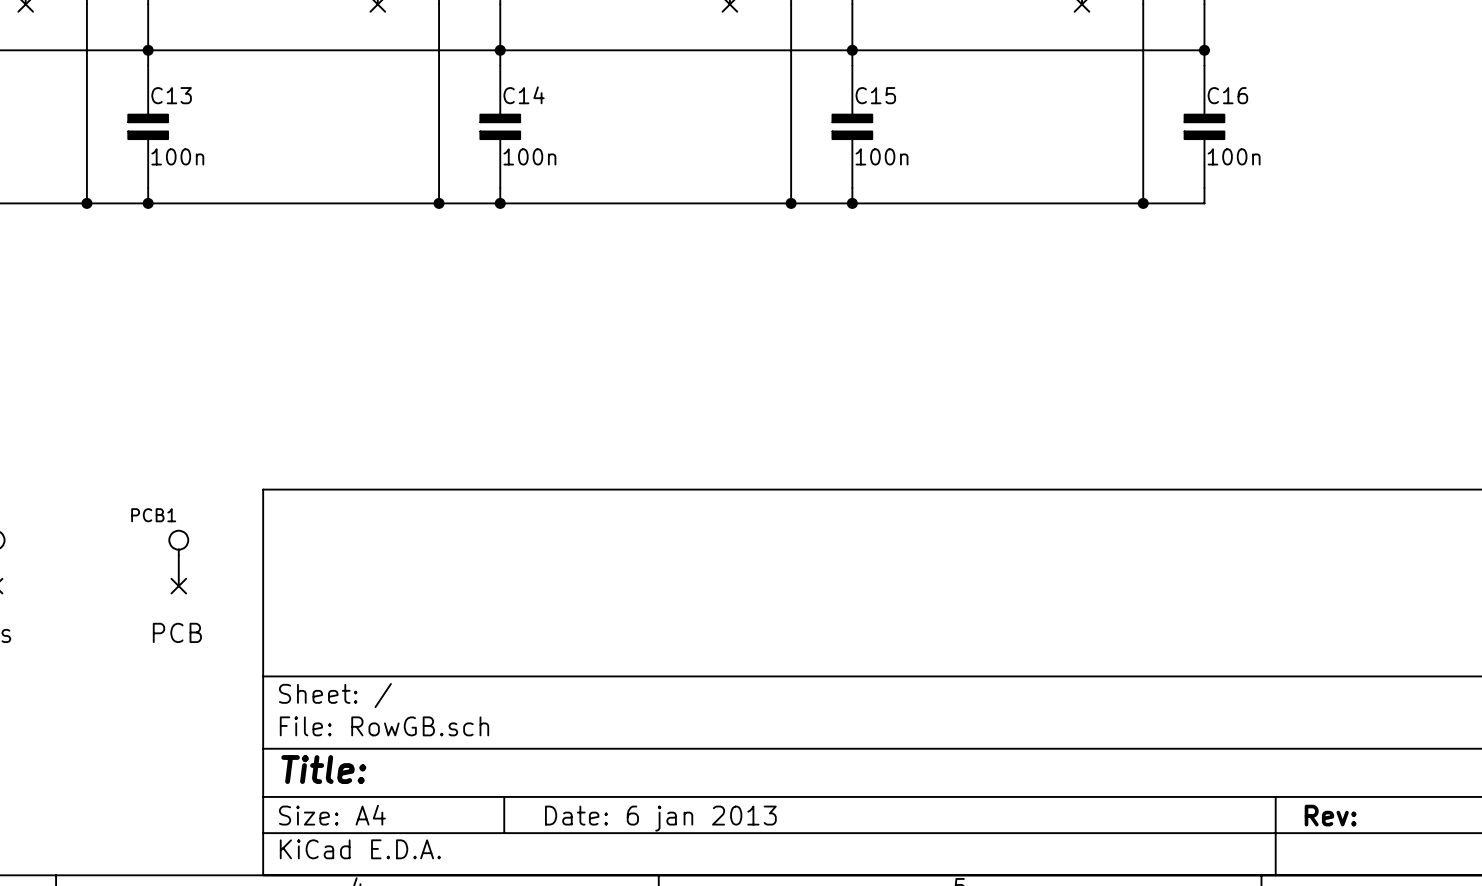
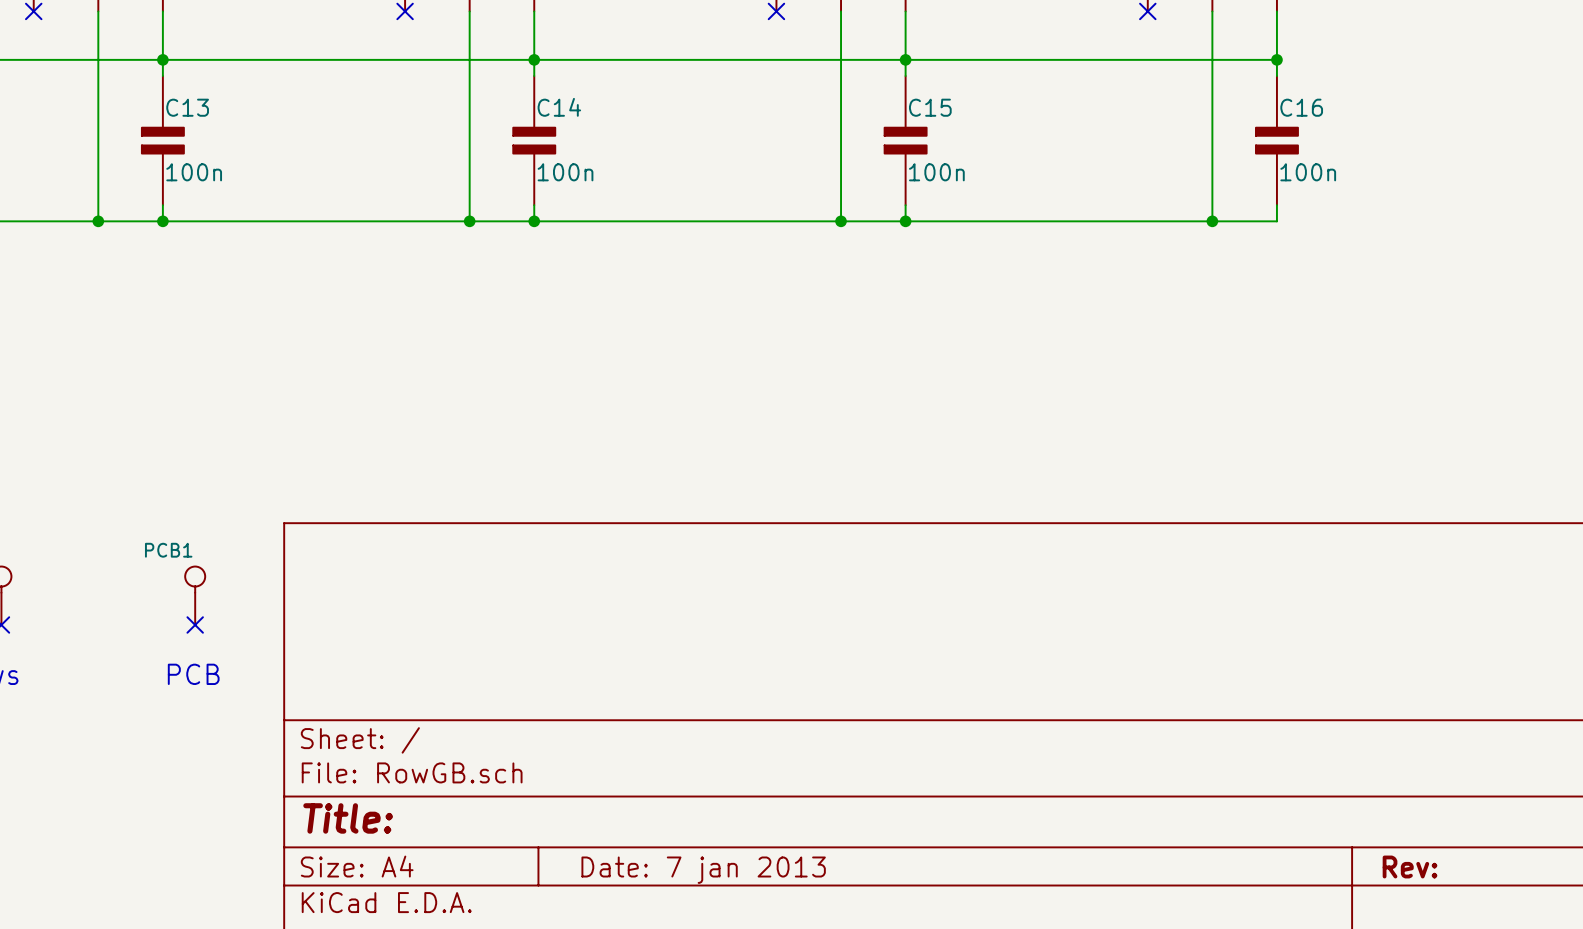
title block: Date: 6 jan 2013 (660, 818) -> Date: 7 jan 2013 (703, 870)

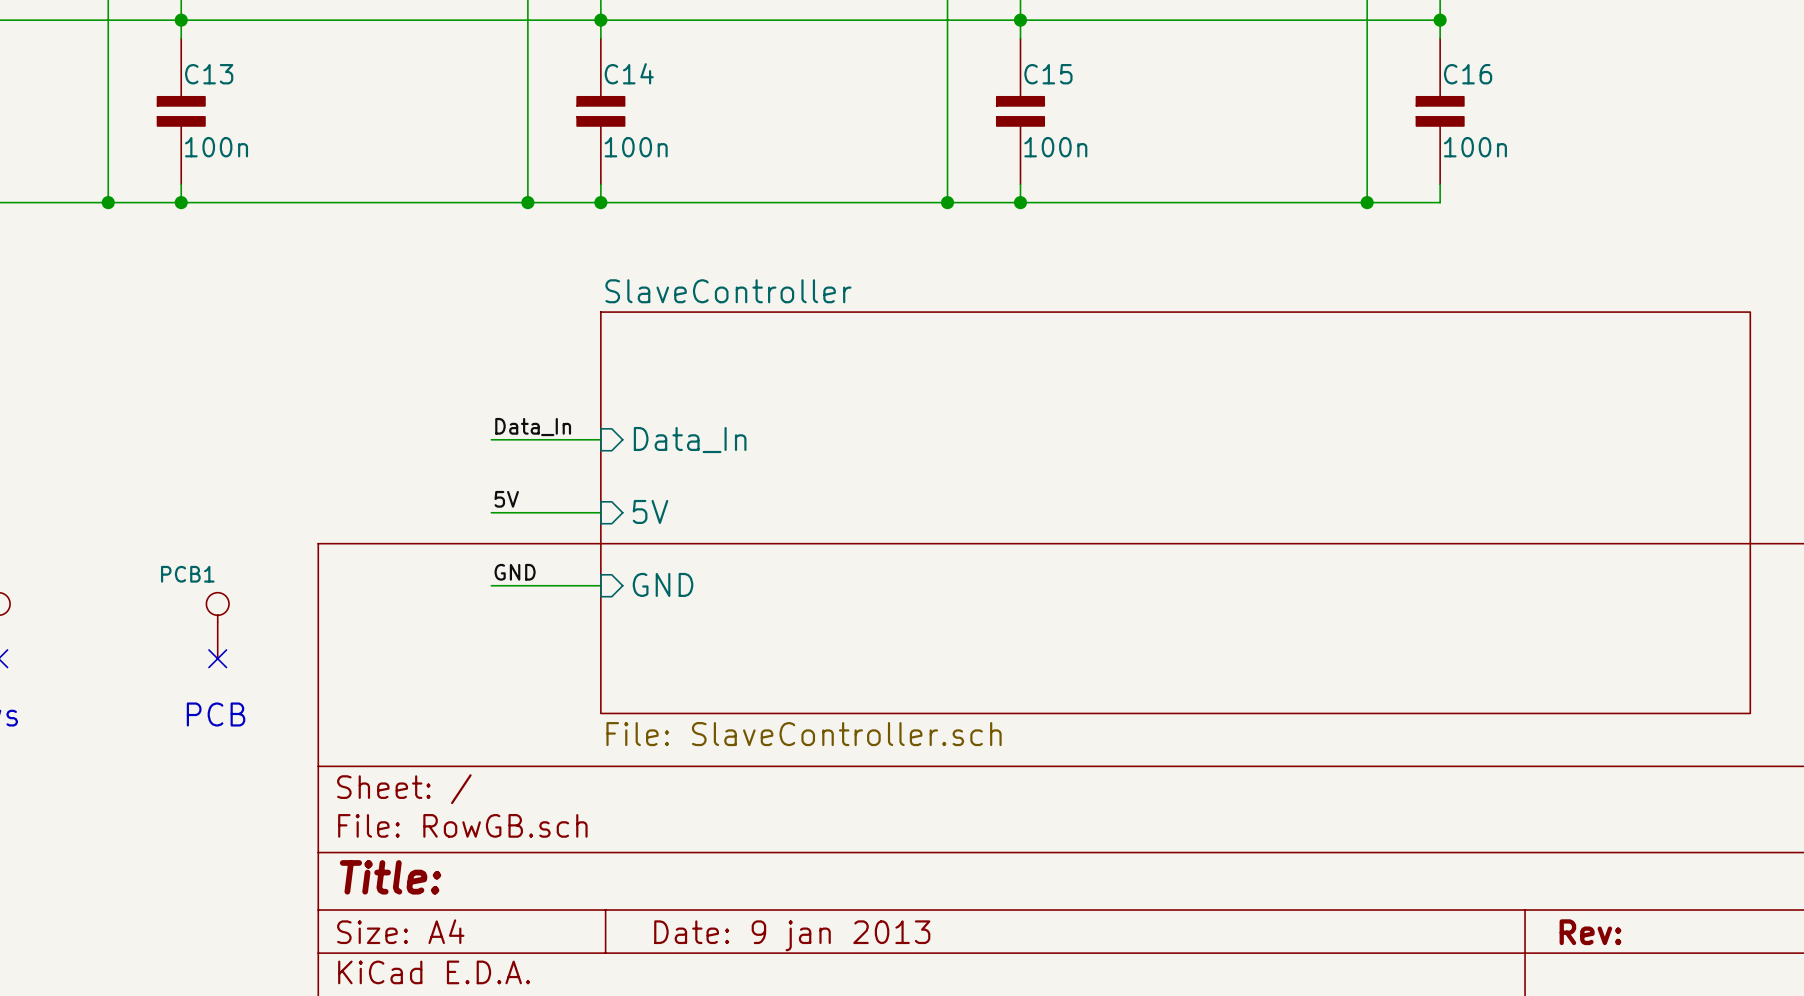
label: none -> Data_In (533, 427)
wire: none -> (491, 439) (600, 439)
sheet pin: none -> Data_In (690, 440)
label: none -> 5V (506, 499)
wire: none -> (491, 512) (600, 512)
sheet pin: none -> 5V (650, 511)
sheet SlaveController: none -> File: SlaveController.sch (1175, 512)
label: none -> GND (515, 572)
sheet pin: none -> GND (663, 584)
wire: none -> (491, 585) (600, 585)
title block: Date: 7 jan 2013 (703, 870) -> Date: 9 jan 2013 (792, 935)

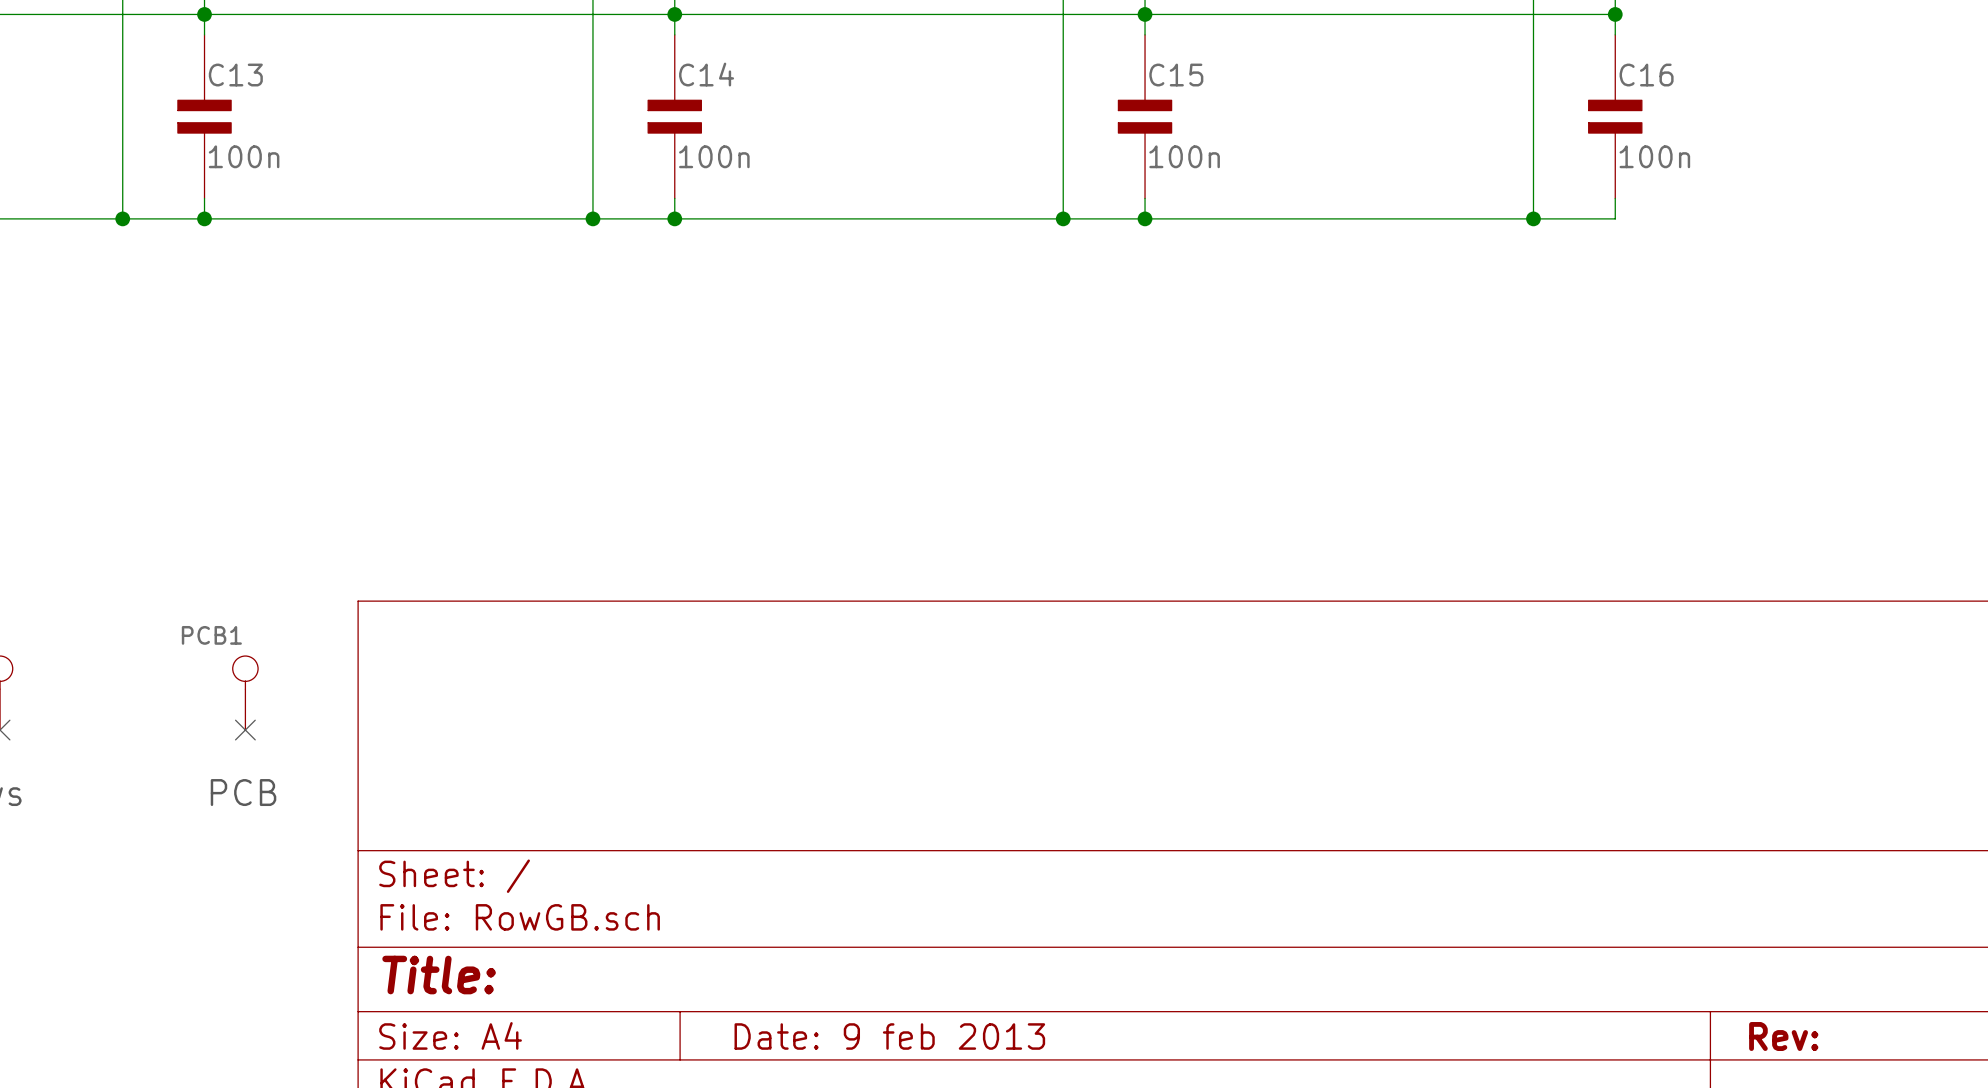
label: Data_In (533, 427) -> none
wire: (491, 439) (600, 439) -> none
sheet pin: Data_In (690, 440) -> none
label: 5V (506, 499) -> none
sheet pin: 5V (650, 511) -> none
wire: (491, 512) (600, 512) -> none
sheet SlaveController: File: SlaveController.sch (1175, 512) -> none
label: GND (515, 572) -> none
sheet pin: GND (663, 584) -> none
wire: (491, 585) (600, 585) -> none
title block: Date: 9 jan 2013 (792, 935) -> Date: 9 feb 2013 (889, 1036)

